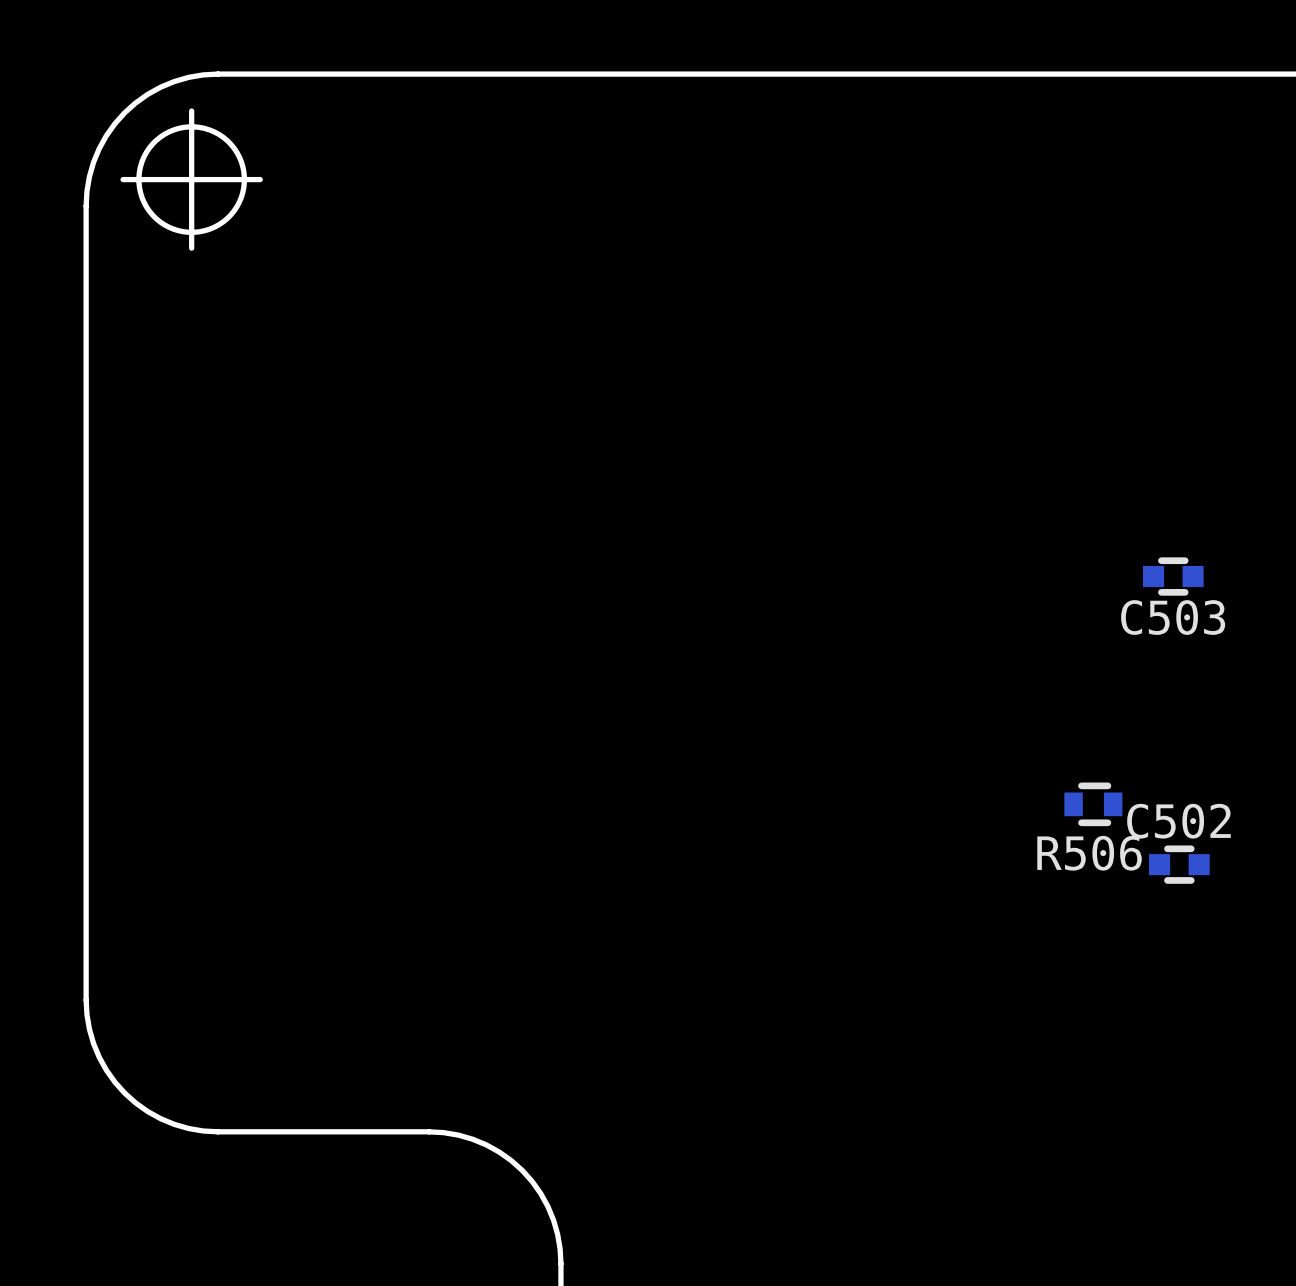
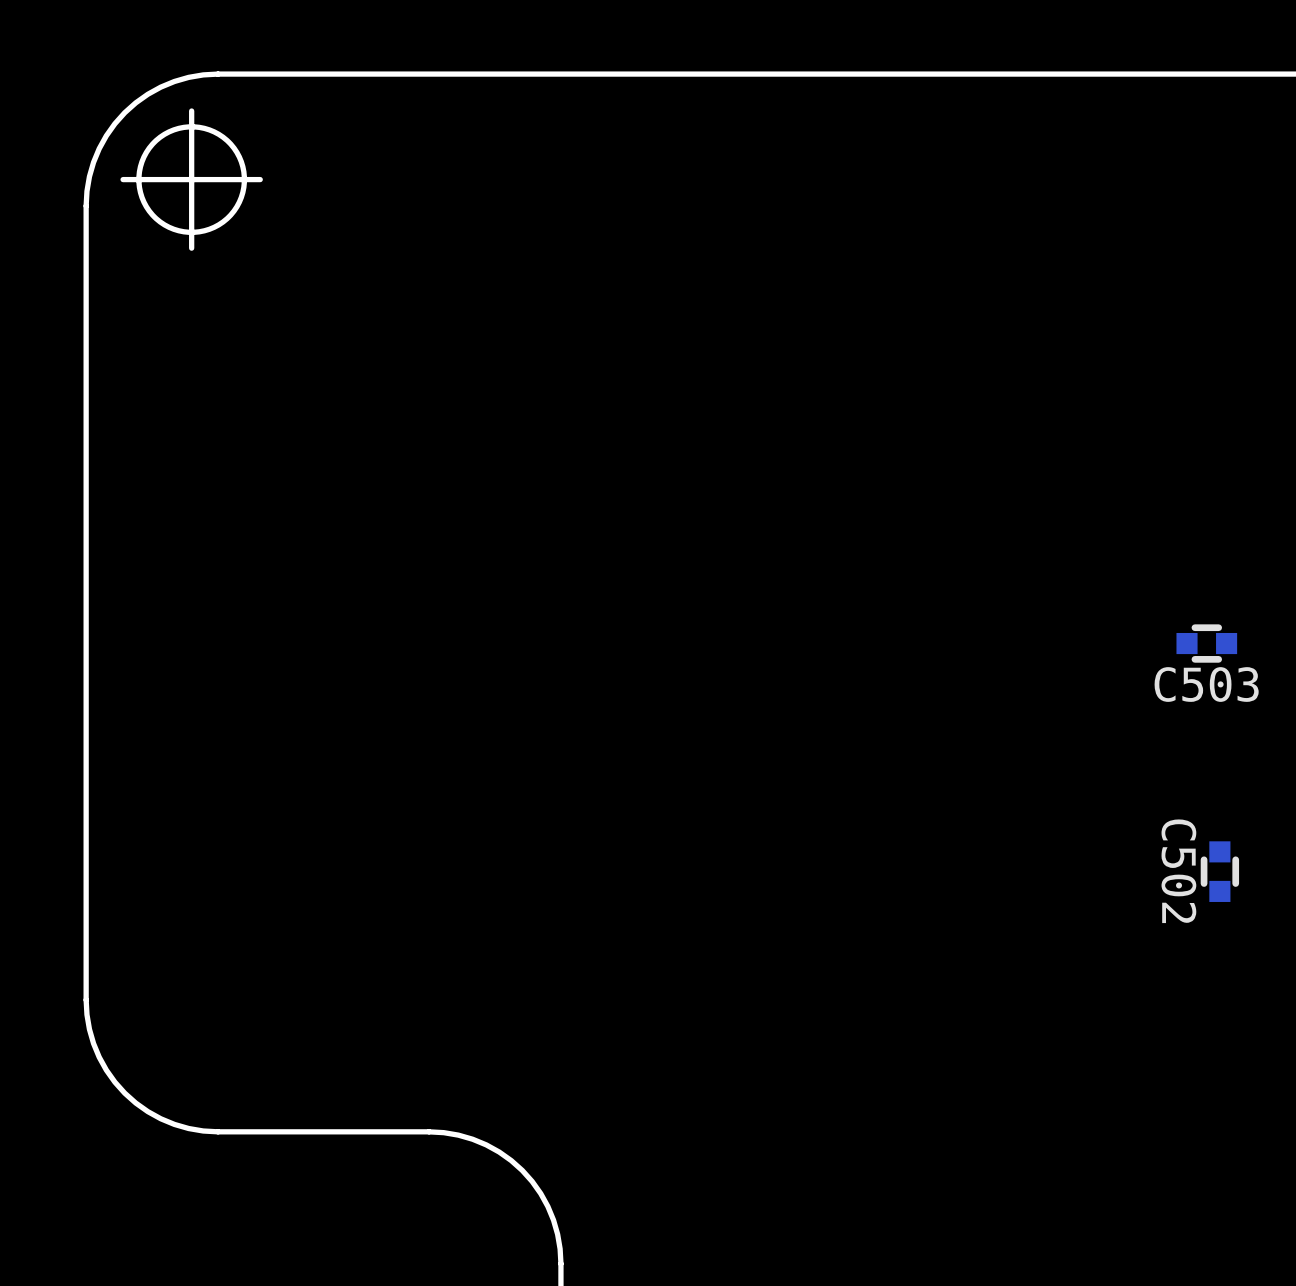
C503 position: (1173, 576) -> (1206, 643)
R506: (1093, 804) -> none
C502 name position: C502 (1178, 821) -> C502 (1178, 871)
C502 rotation: 0° (1179, 864) -> 90° clockwise (1219, 871)
C502 position: (1179, 864) -> (1219, 871)

